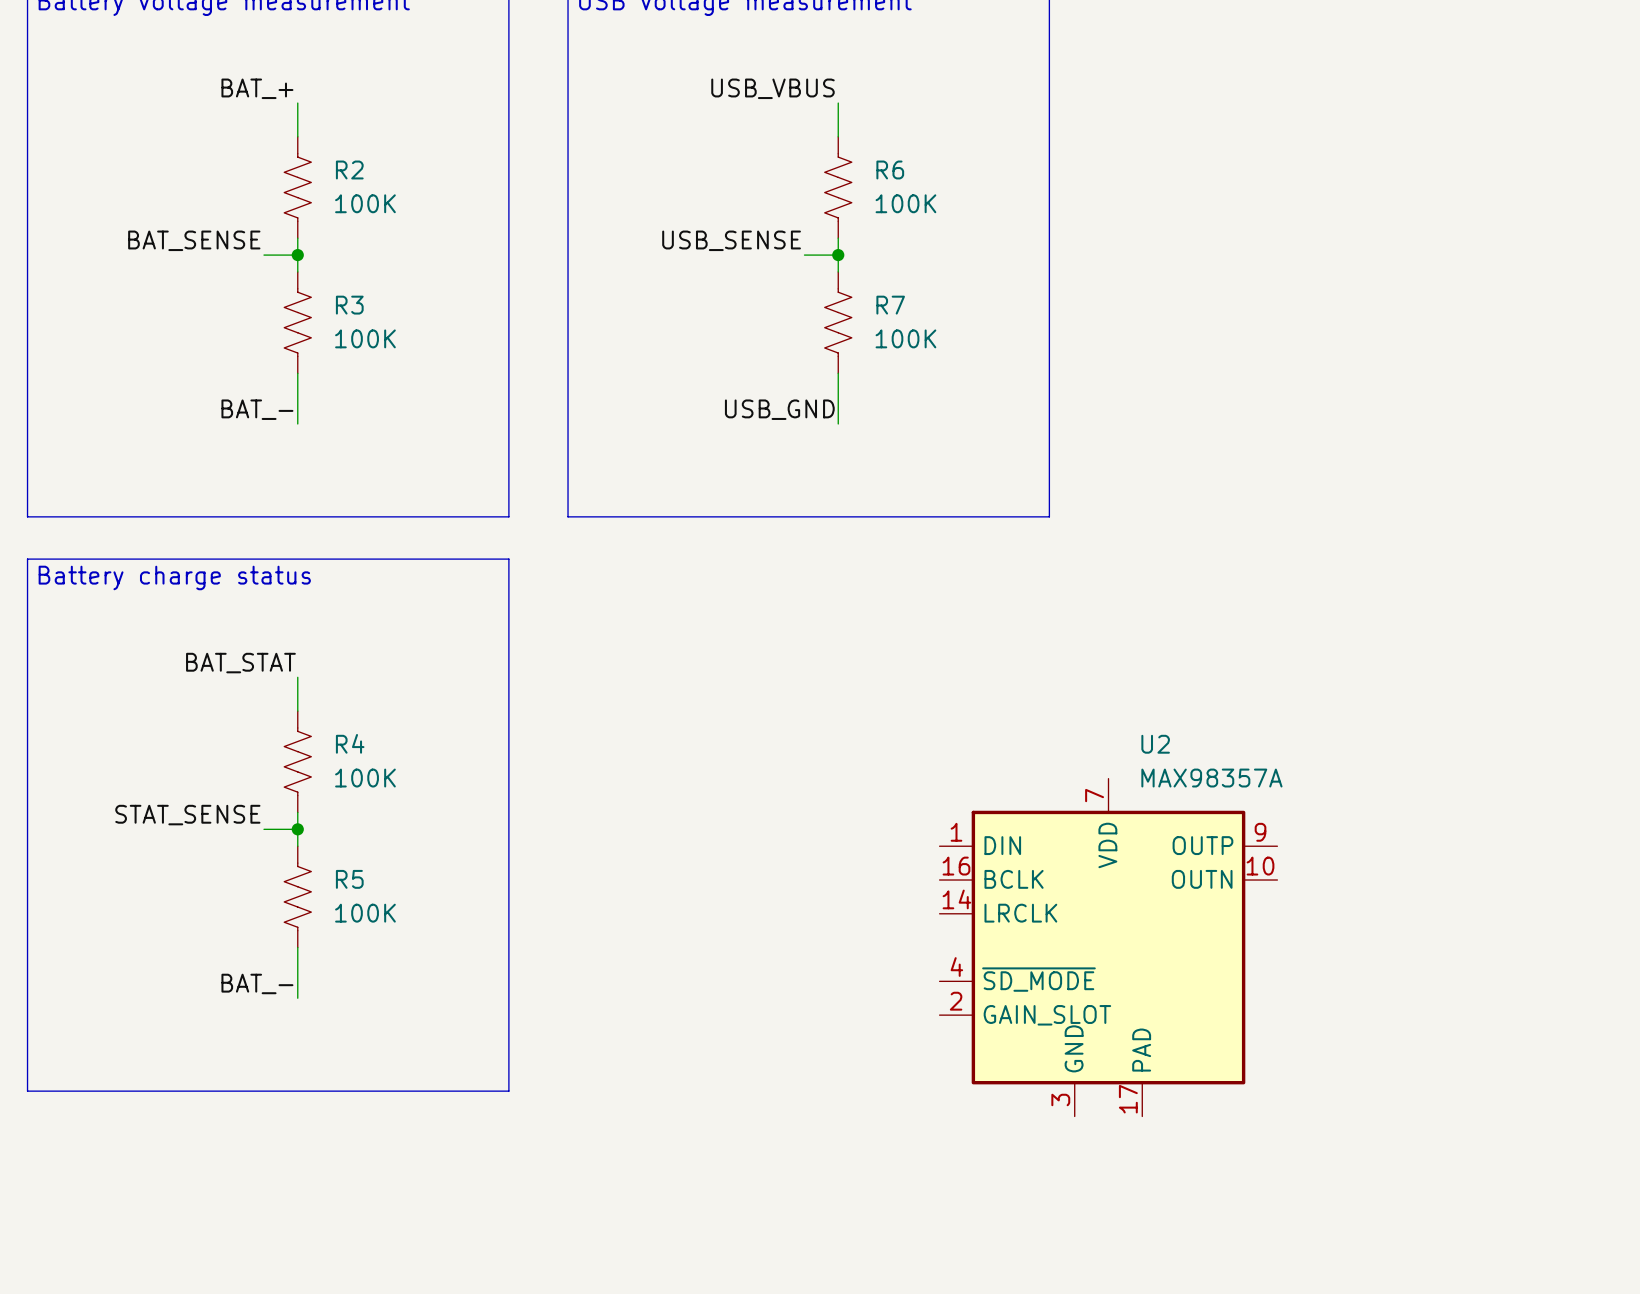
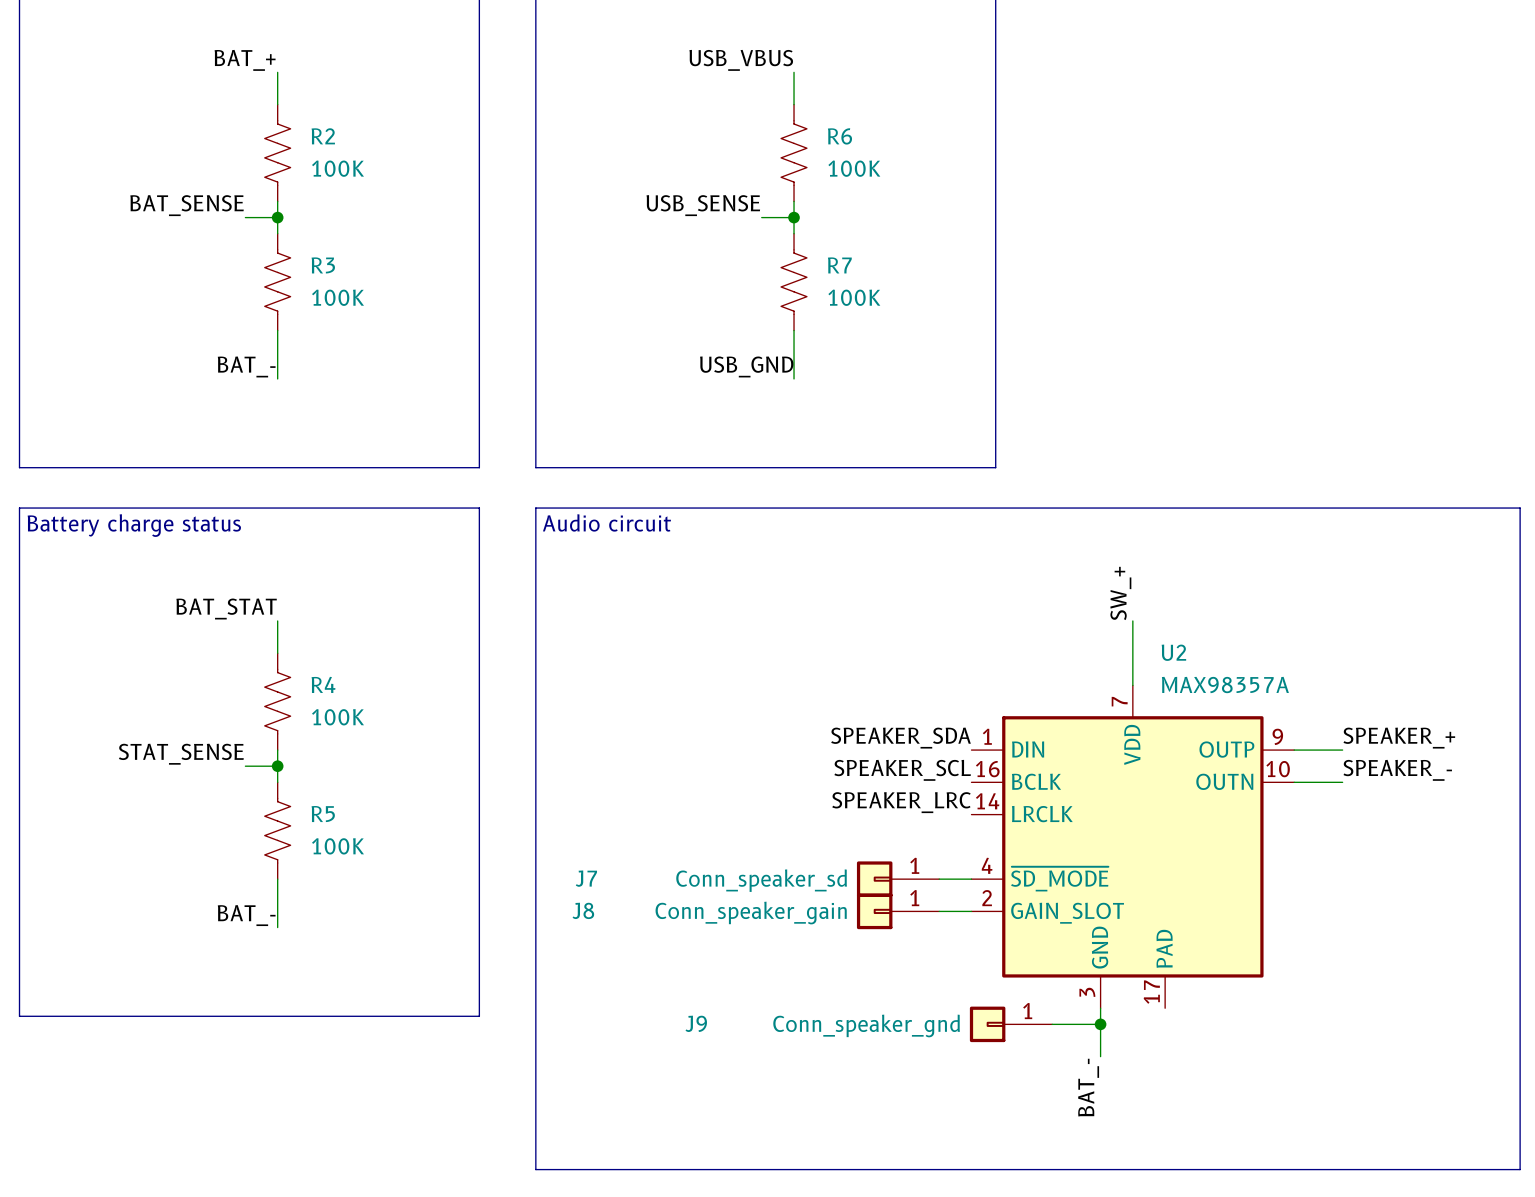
line: none -> (535, 508) (1520, 508) (1520, 1169) (535, 1169) (535, 508)
text: none -> Audio circuit (606, 522)
label: none -> SW_+ (1120, 593)
wire: none -> (1132, 620) (1132, 685)
label: none -> SPEAKER_SDA (900, 738)
label: none -> SPEAKER_+ (1399, 738)
wire: none -> (1294, 750) (1342, 750)
label: none -> SPEAKER_SCL (902, 770)
label: none -> SPEAKER_- (1397, 770)
wire: none -> (1294, 782) (1342, 782)
label: none -> SPEAKER_LRC (901, 802)
J7: none -> Conn_speaker_sd (898, 879)
U2 position: (1108, 947) -> (1132, 846)
J8: none -> Conn_speaker_gain (898, 911)
wire: none -> (1100, 1008) (1100, 1056)
J9: none -> Conn_speaker_gnd (1011, 1024)
wire: none -> (1052, 1024) (1100, 1024)
junction: none -> (1100, 1024)
label: none -> BAT_- (1088, 1087)

